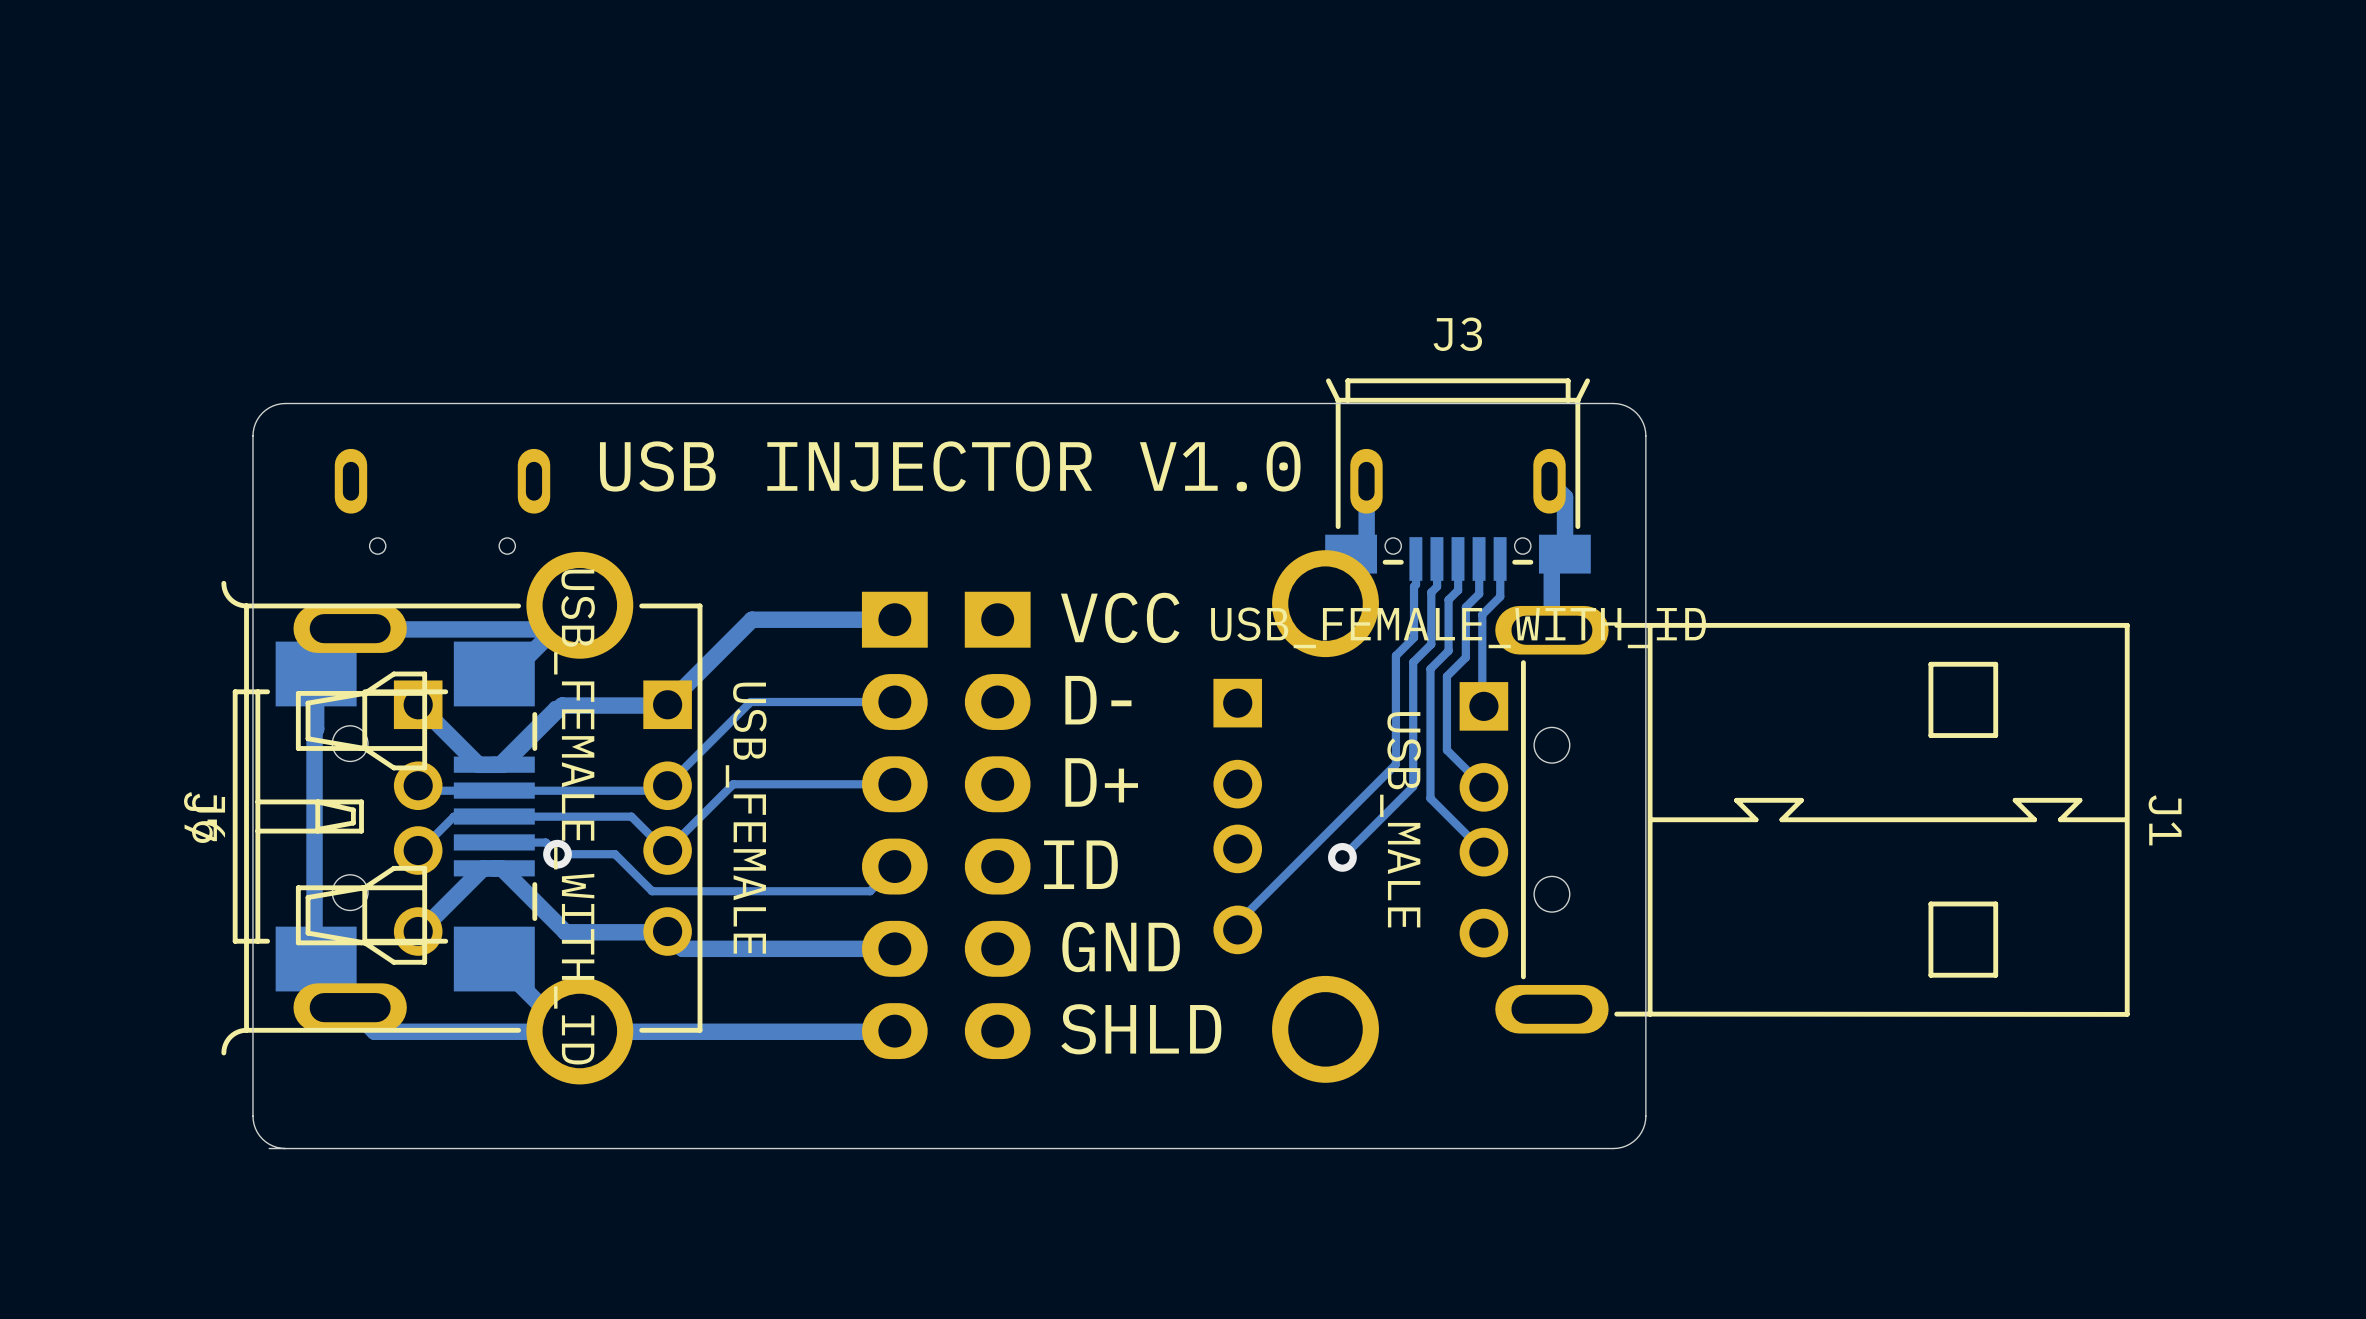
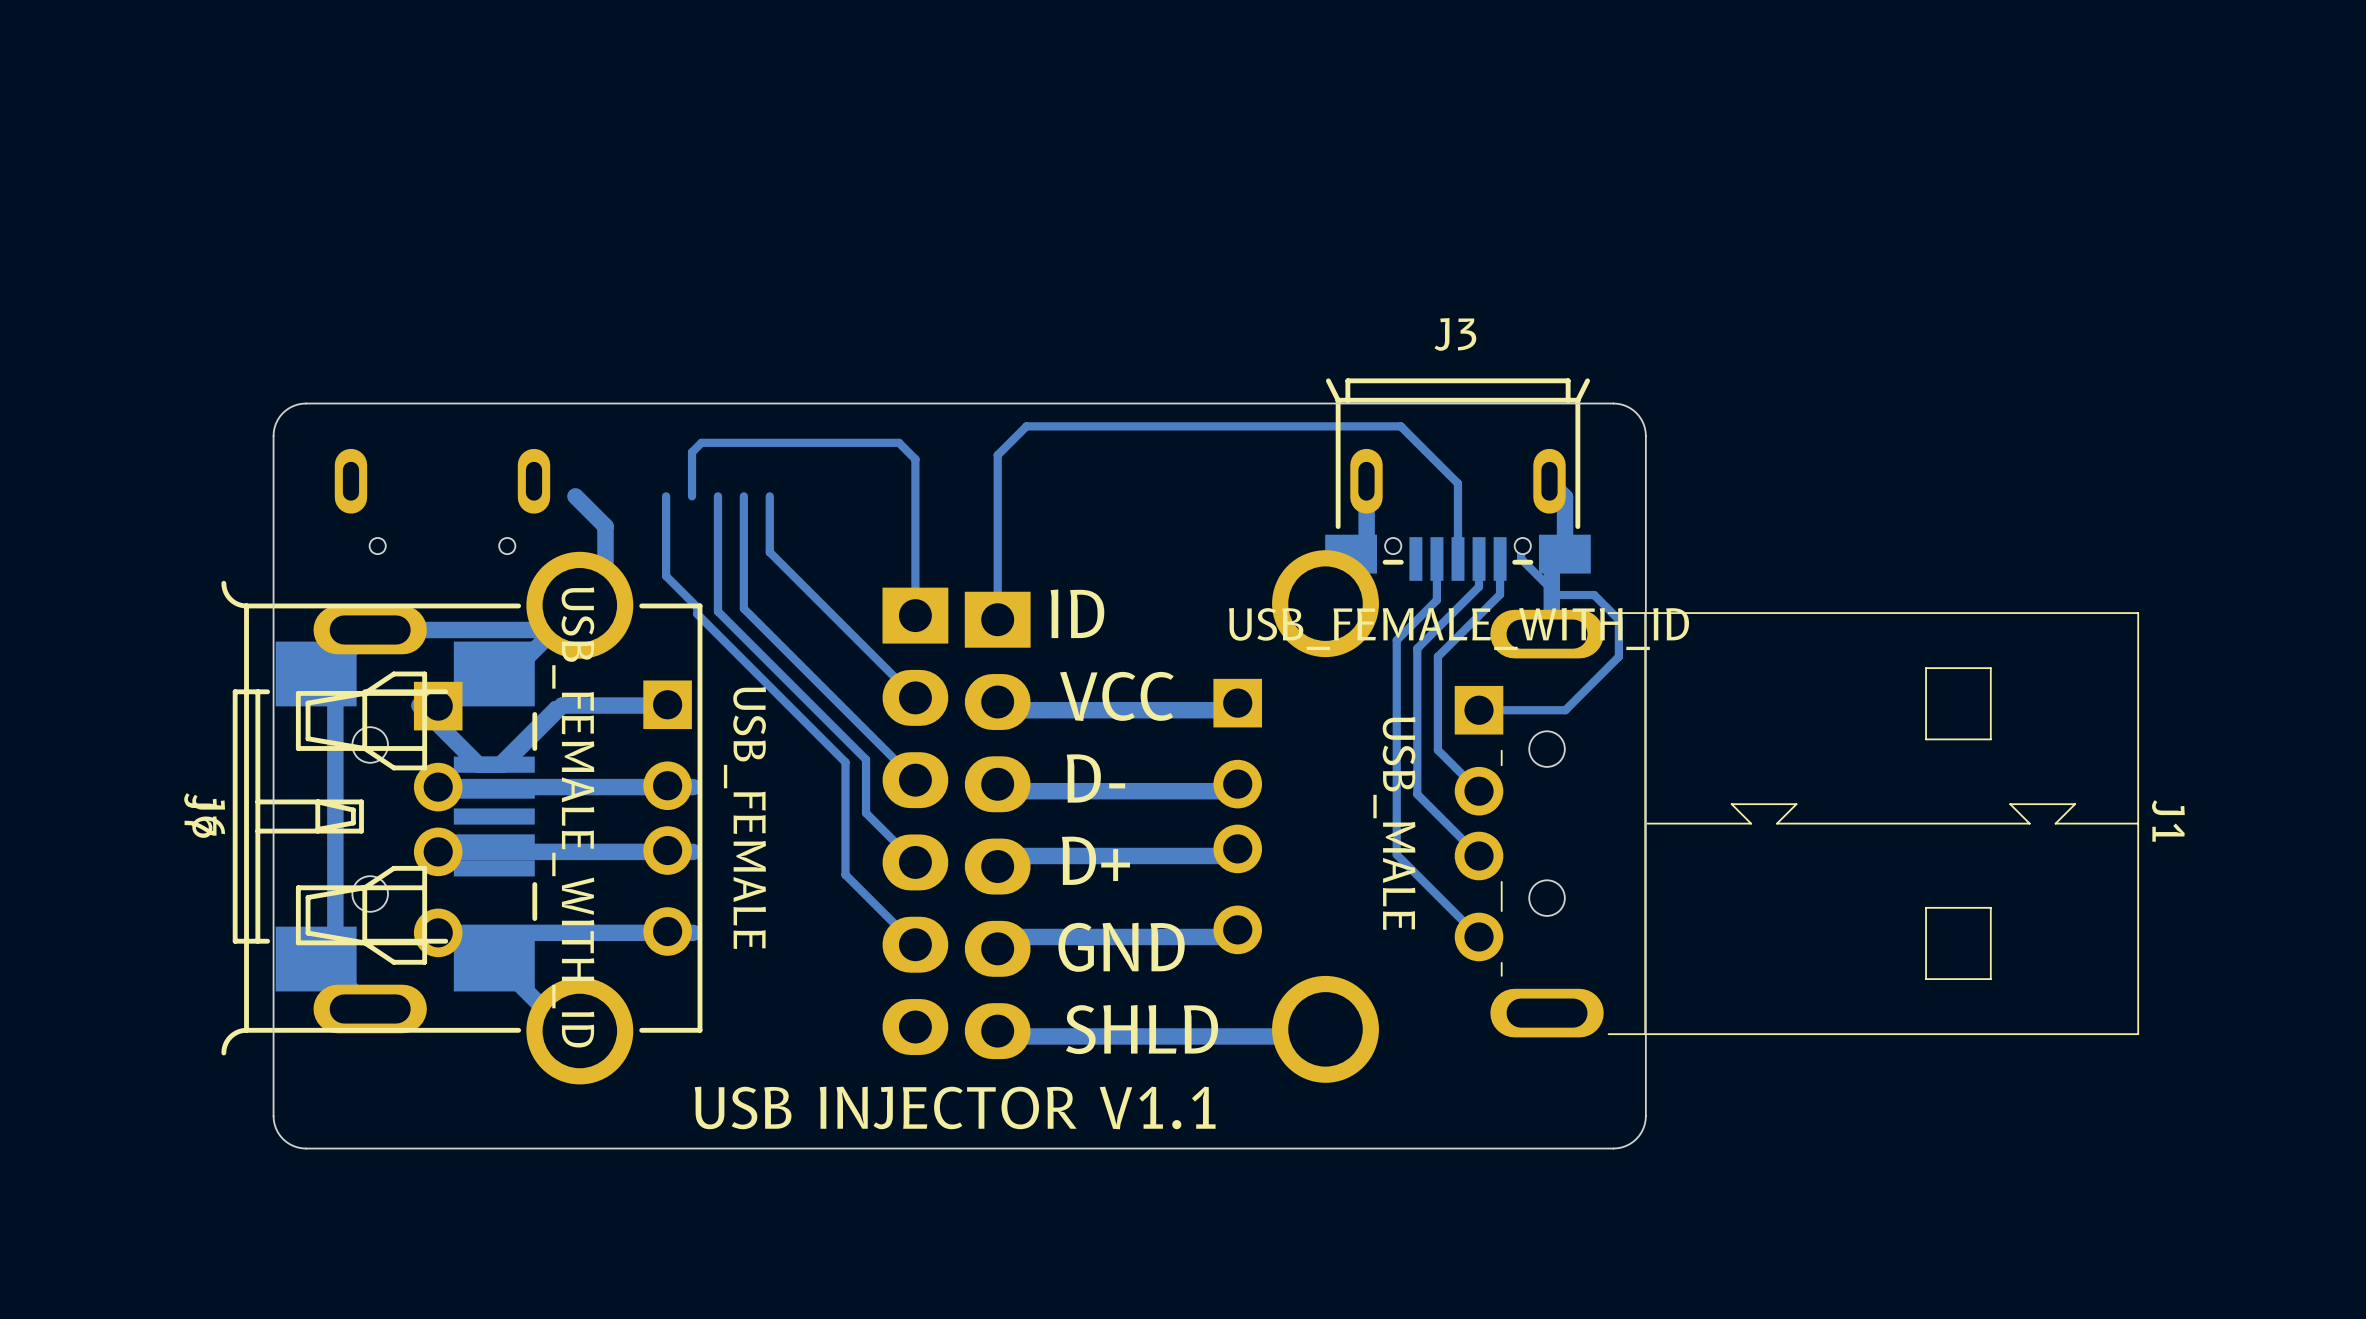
board edge: (305, 403) (281, 403) (269, 407) (257, 419) (252, 435) (252, 1116) (255, 1128) (262, 1139) (272, 1146) (285, 1148) -> (305, 403) (293, 405) (283, 412) (276, 423) (273, 435) (273, 1116) (276, 1128) (283, 1139) (293, 1146) (305, 1148)
text: USB INJECTOR V1.0 (950, 466) -> none
track: none -> (575, 496) (605, 526) (605, 606) (582, 629) (370, 629) (335, 664) (335, 973) (370, 1008)
track: none -> (666, 496) (666, 576) (697, 607) (697, 614) (845, 762) (845, 874) (915, 944)
track: none -> (692, 496) (692, 452) (701, 442) (898, 442) (915, 459) (915, 615)
track: none -> (717, 496) (717, 611) (866, 759) (866, 813) (915, 862)
track: none -> (743, 496) (743, 608) (915, 780)
track: none -> (769, 496) (769, 552) (915, 697)
track: none -> (1436, 549) (1436, 600) (1396, 640) (1396, 854) (1479, 936)
track: none -> (1457, 549) (1457, 483) (1400, 426) (1026, 426) (997, 455) (997, 615)
track: none -> (1479, 549) (1479, 586) (1417, 648) (1417, 794) (1479, 856)
track: none -> (1521, 549) (1521, 558) (1557, 595) (1594, 595) (1618, 619) (1618, 656) (1565, 710) (1479, 710)
track: (1416, 559) (1414, 637) (1395, 655) (1395, 764) (1236, 923) (1236, 932) -> none
track: (1437, 559) (1437, 586) (1431, 592) (1431, 644) (1413, 662) (1413, 786) (1342, 857) -> none
track: (1458, 559) (1458, 590) (1448, 599) (1448, 650) (1430, 668) (1430, 798) (1483, 851) -> none
track: (1479, 559) (1479, 593) (1465, 607) (1465, 657) (1446, 676) (1446, 750) (1483, 786) -> none
track: (1500, 594) (1500, 596) (1482, 614) (1483, 705) -> (1500, 594) (1437, 656) (1437, 750) (1479, 791)
J1 footprint: [1459, 605, 2130, 1034] -> [1454, 609, 2140, 1038]
text position: VCC (1120, 617) -> VCC (1116, 696)
track: (894, 619) (751, 619) (666, 705) -> none
track: (555, 629) (351, 629) (351, 639) (316, 674) (314, 957) (351, 994) (351, 1008) (374, 1031) (894, 1031) -> none
track: none -> (997, 697) (1010, 710) (1223, 710)
text position: D- (1098, 700) -> D- (1095, 778)
track: (894, 702) (750, 702) (661, 790) (423, 790) (419, 786) -> none
track: none -> (997, 780) (1008, 791) (1223, 791)
text position: D+ (1101, 782) -> D+ (1095, 860)
track: (894, 784) (733, 784) (666, 851) (631, 816) (453, 816) (419, 851) -> none
track: none -> (693, 787) (438, 787)
part position: (367, 818) -> (388, 819)
part position: (894, 825) -> (915, 821)
track: (494, 842) (545, 842) (557, 854) (615, 854) (652, 891) (870, 891) (894, 866) -> none
track: none -> (693, 851) (438, 851)
via: (557, 854) -> none
track: none -> (1223, 856) (1004, 856) (997, 862)
via: (1342, 857) -> none
text position: ID (1080, 864) -> ID (1077, 613)
track: (419, 932) (483, 868) (501, 868) (565, 932) (666, 932) (682, 948) (894, 948) -> none
track: none -> (693, 932) (438, 932)
track: none -> (1223, 936) (1005, 936) (997, 944)
track: none -> (997, 1027) (1007, 1036) (1311, 1036)
text: none -> USB INJECTOR V1.1 (955, 1107)
board edge: (305, 1148) (269, 1148) -> none

